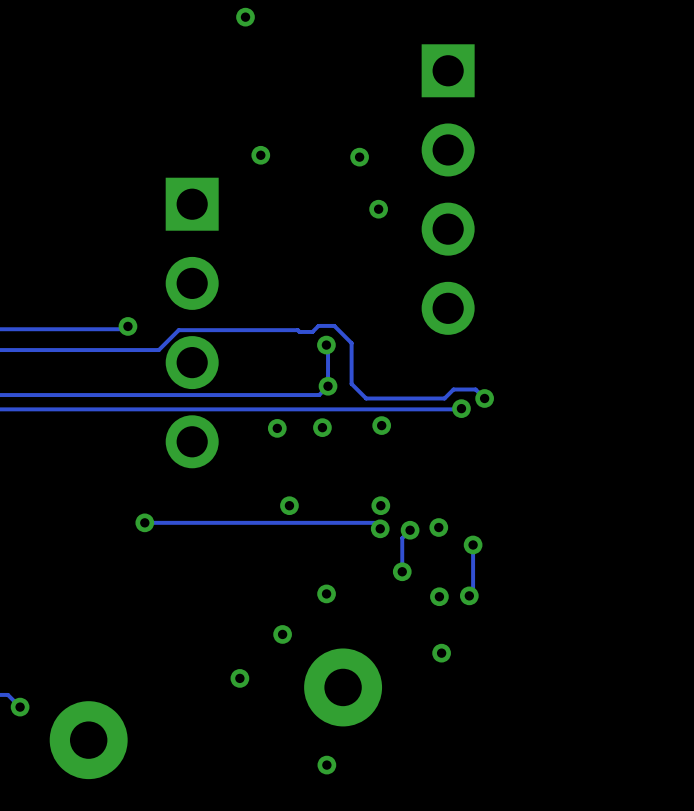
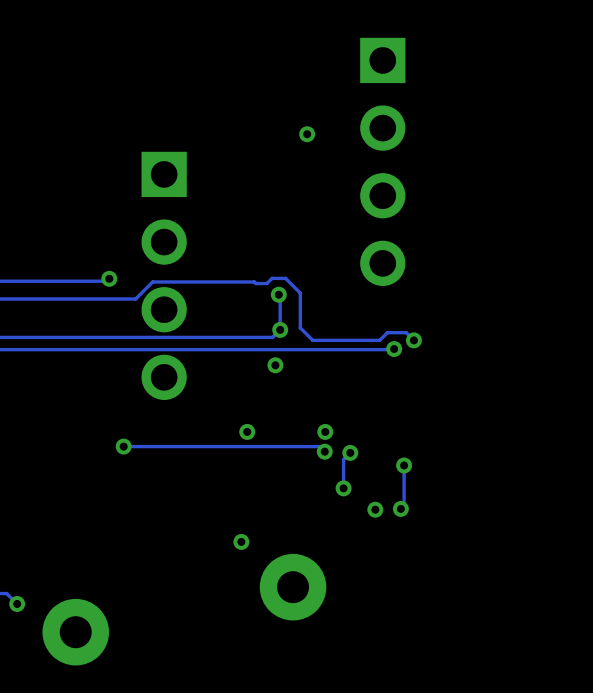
via: (245, 17) -> none
via: (260, 155) -> none
via: (378, 209) -> none
via: (381, 425) -> none
via: (277, 428) -> none
via: (438, 527) -> none
via: (326, 593) -> none
via: (441, 653) -> none
via: (239, 678) -> none
via: (326, 765) -> none

